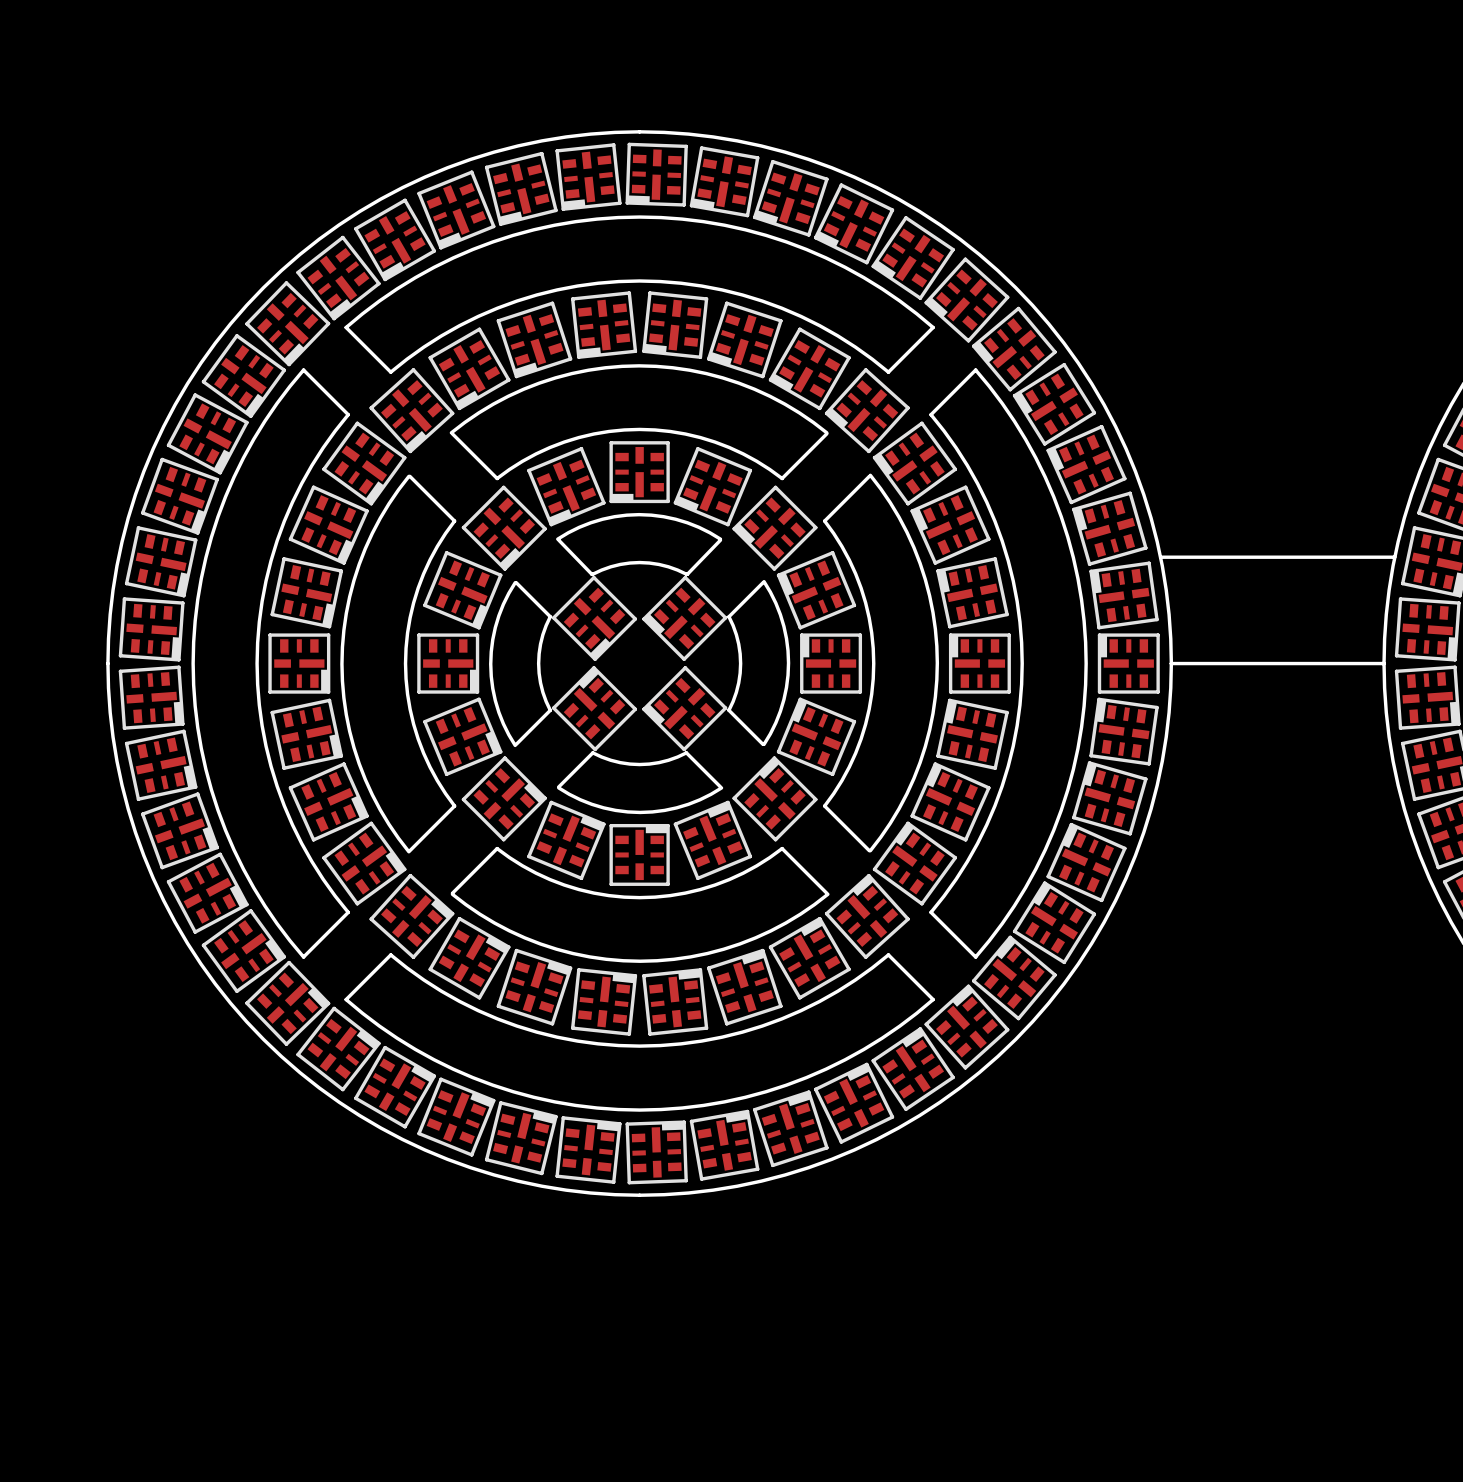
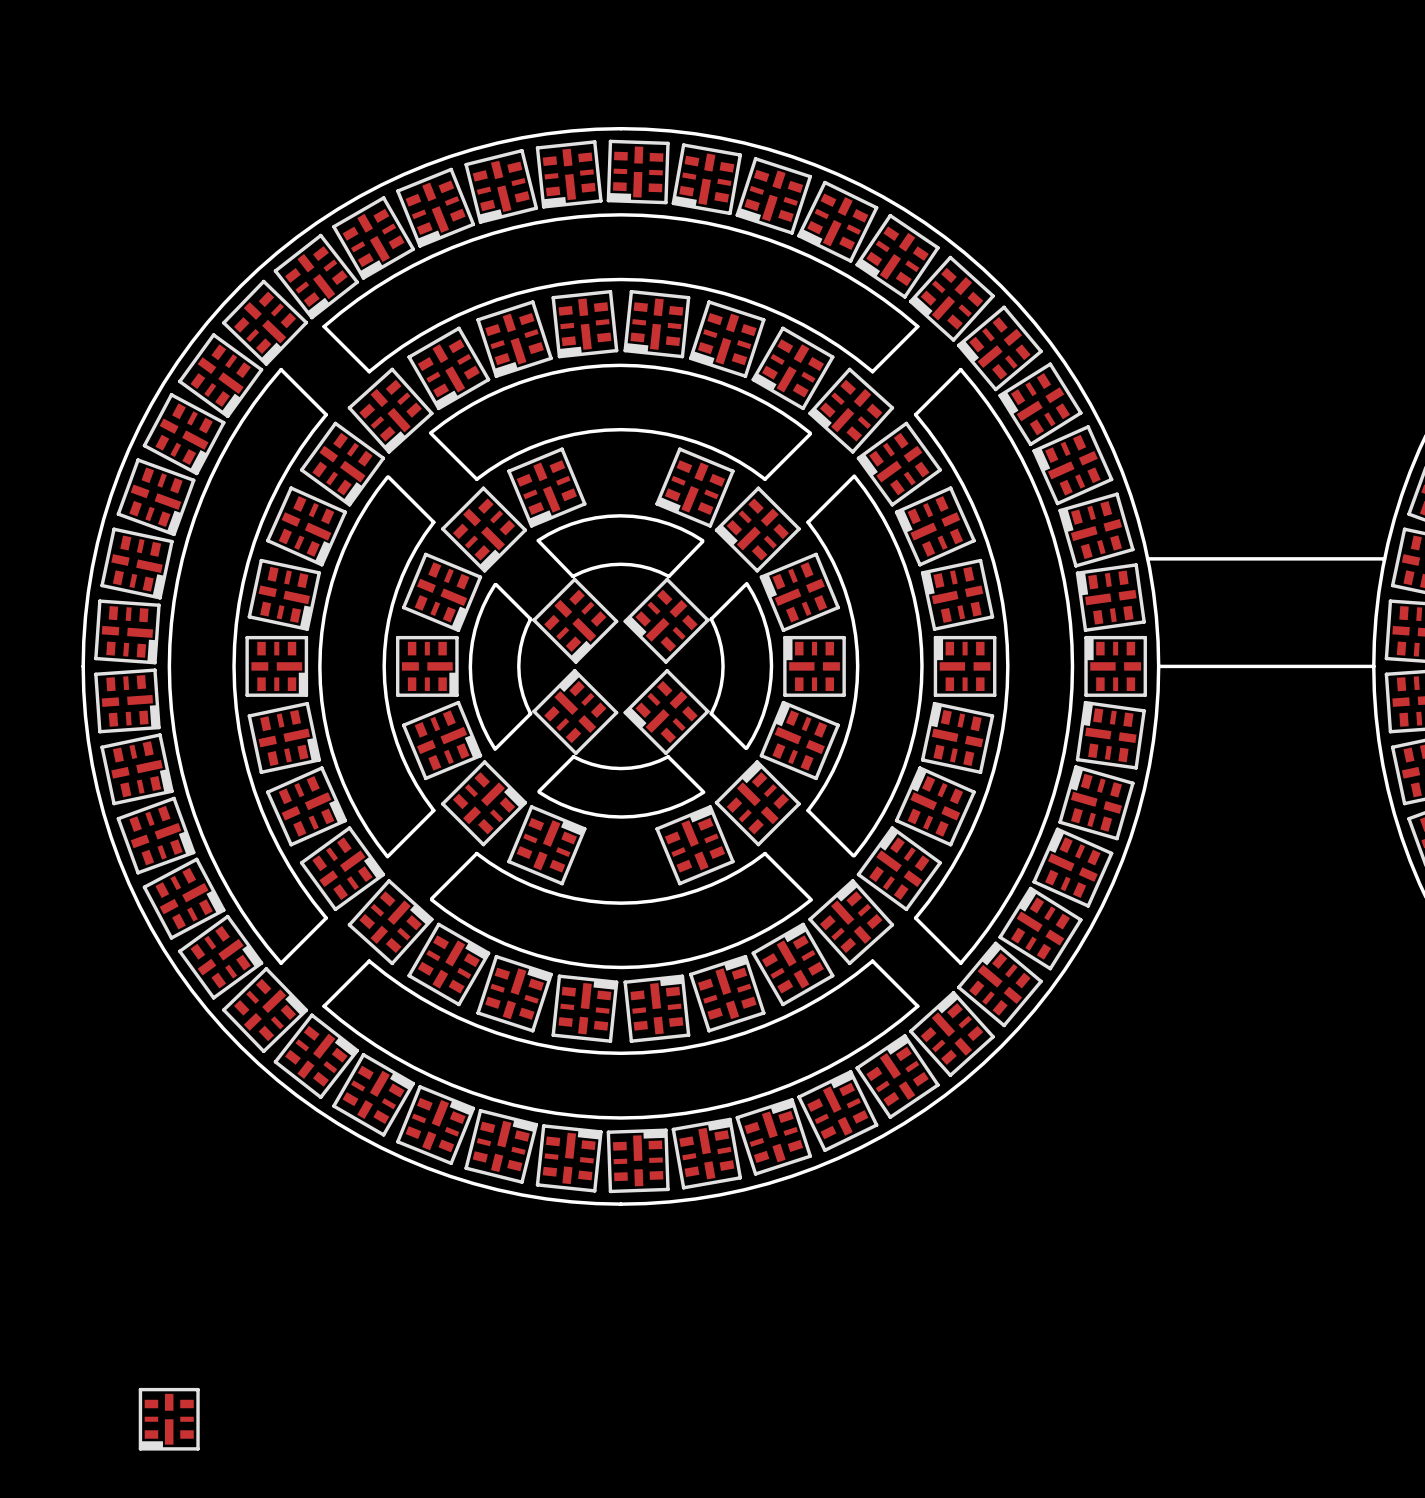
part: (639, 472) -> none
part: (639, 854) -> none
part: none -> (169, 1419)

